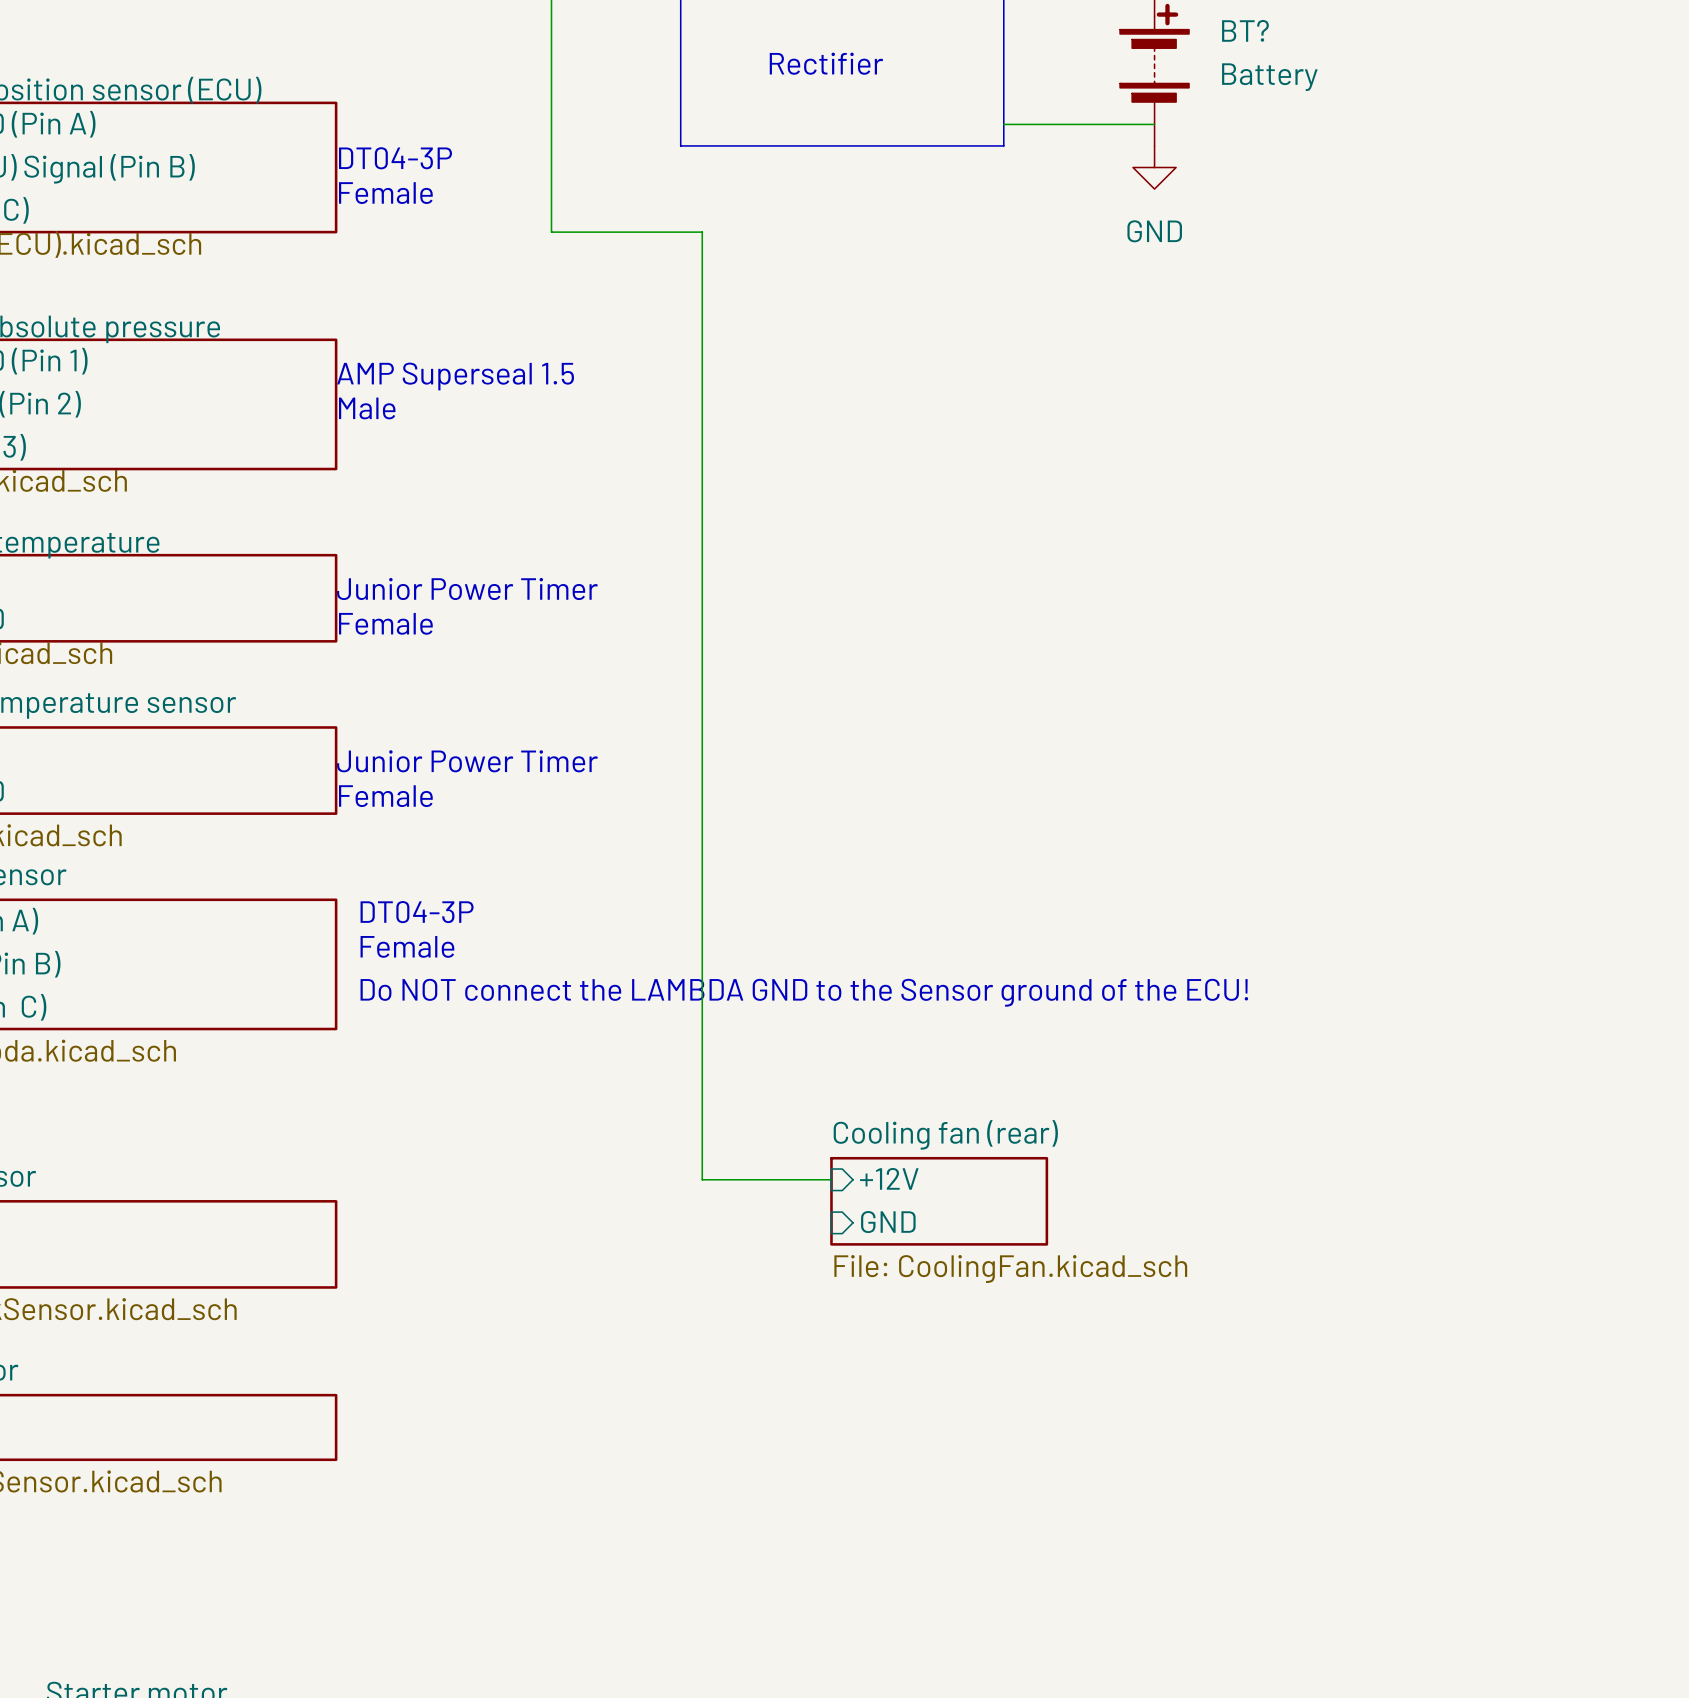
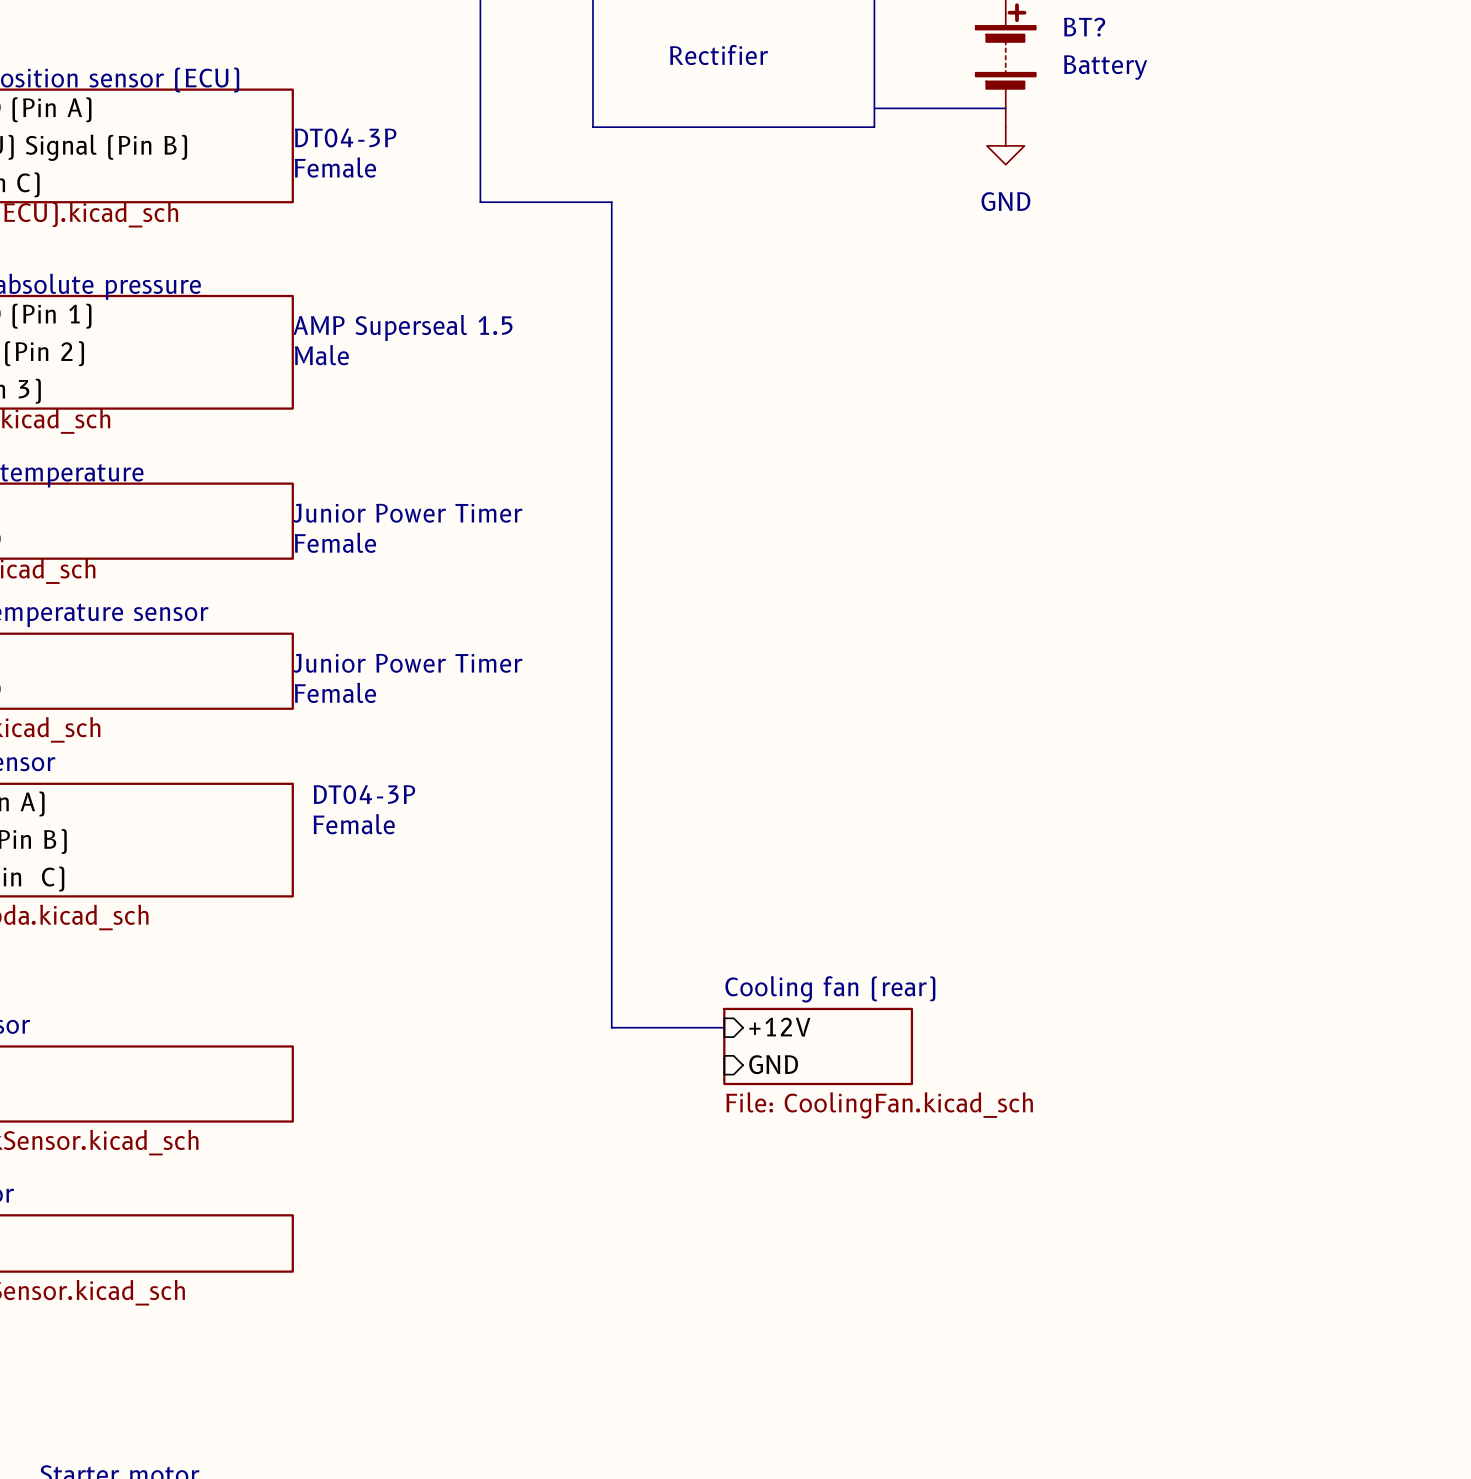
text: Do NOT connect the LAMBDA GND to the Sensor ground of the ECU! (804, 992) -> none

